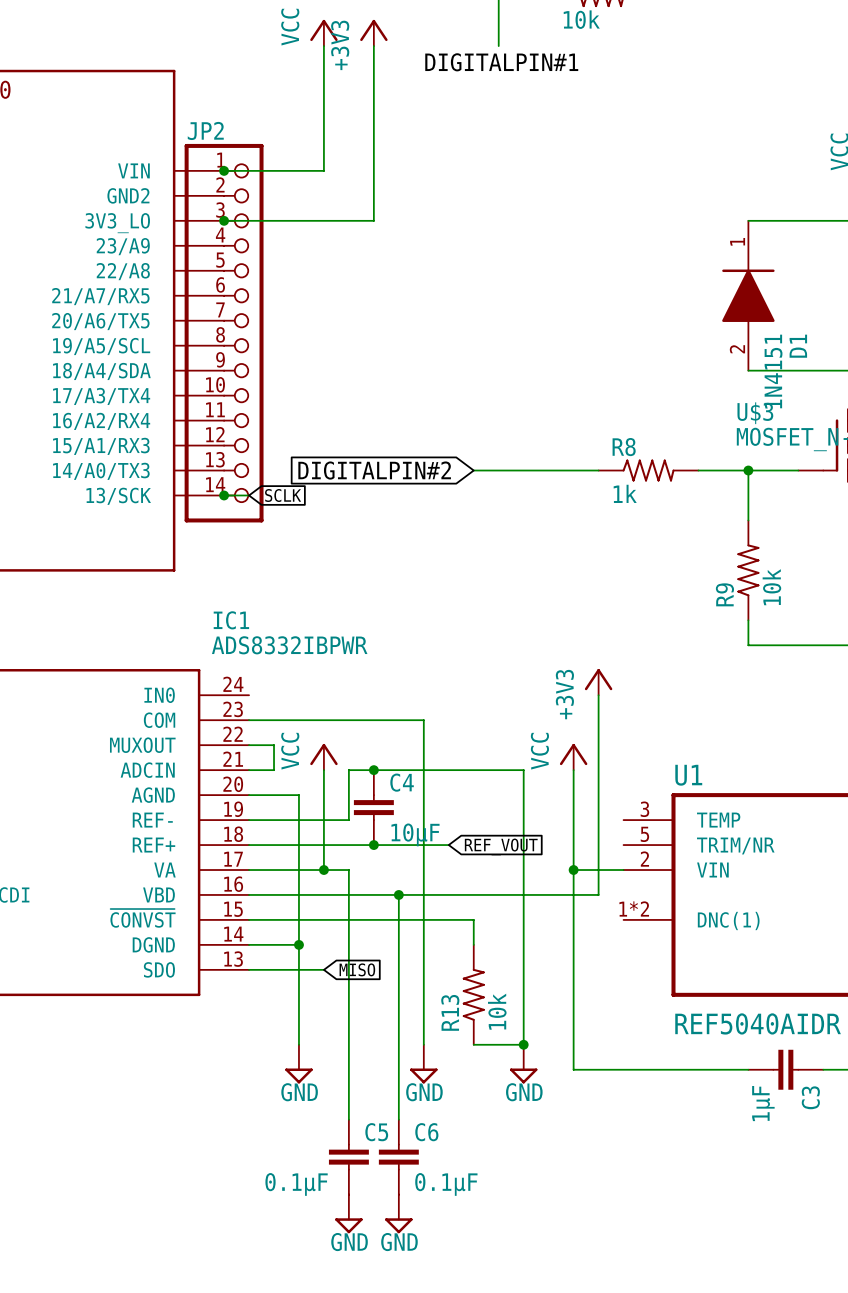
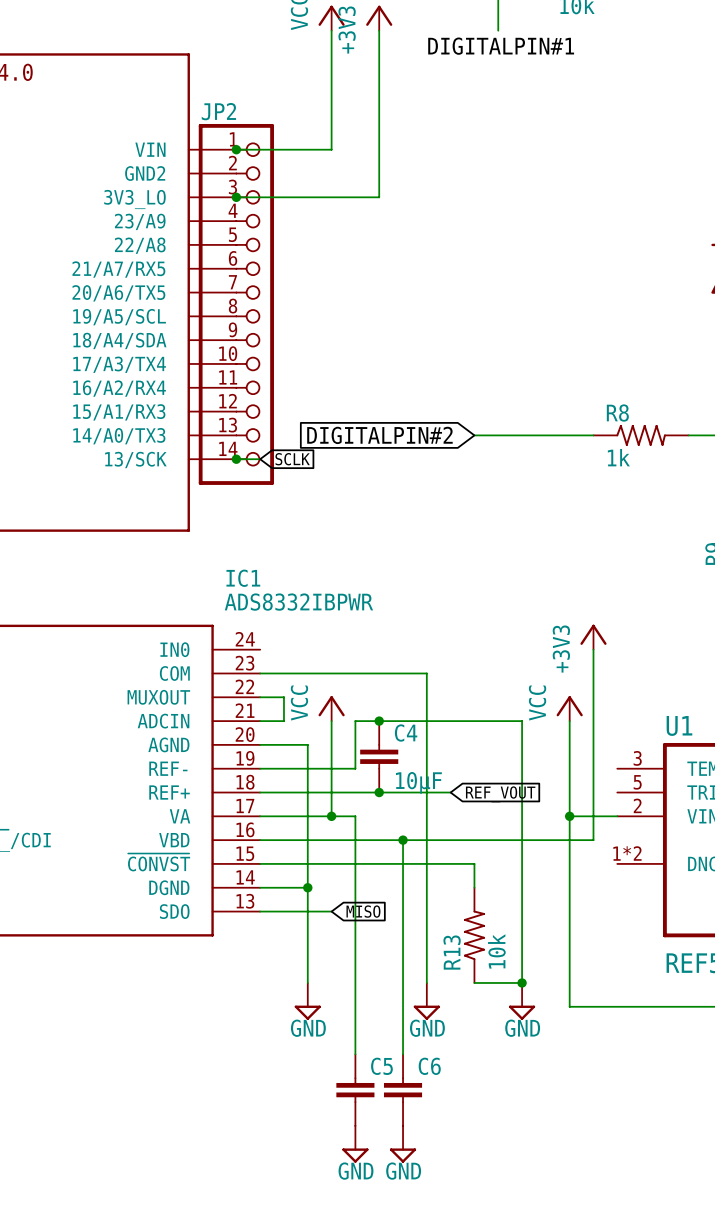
C5 value: 0.1μF (296, 1184) -> none
C6 value: 0.1μF (446, 1184) -> none

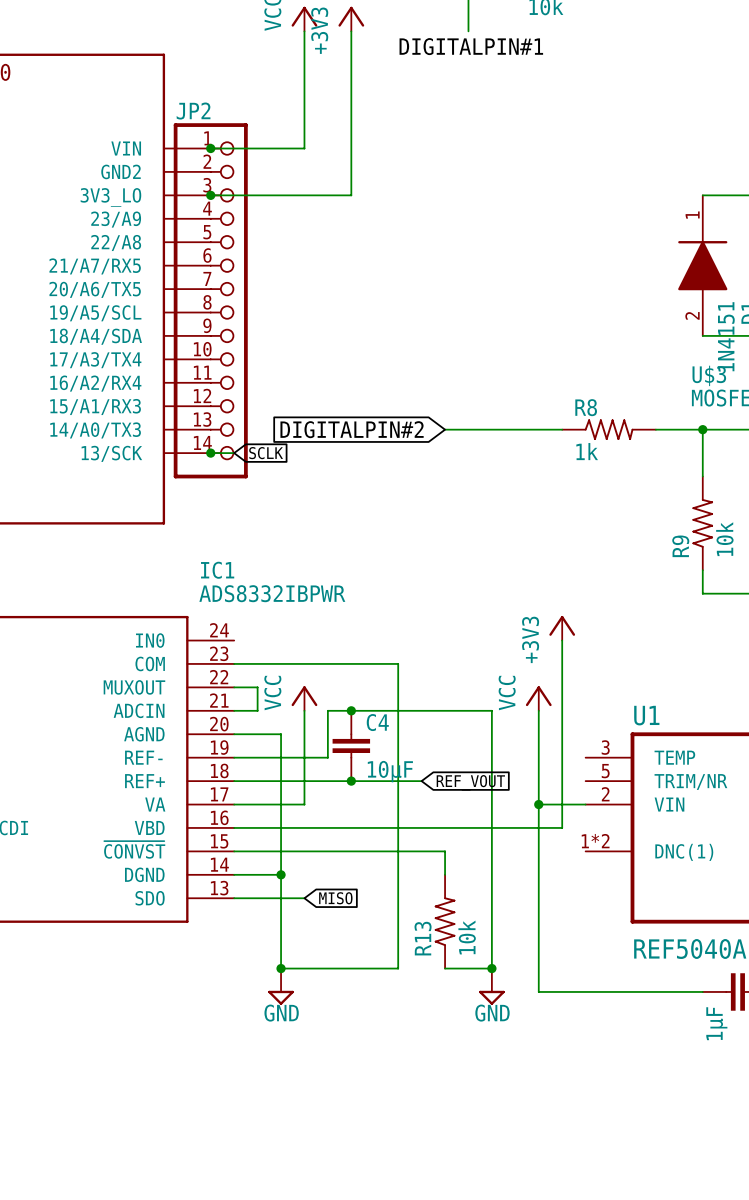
wire: (331, 816) (355, 816) (355, 1054) -> none
junction: (331, 816) -> none
wire: (403, 840) (403, 1054) -> none
junction: (403, 840) -> none
wire: none -> (281, 968) (398, 968)
junction: none -> (281, 968)
power symbol: GND (426, 1001) -> none
C5: (355, 1090) -> none
C6: (403, 1090) -> none
power symbol: GND (355, 1144) -> none
power symbol: GND (403, 1144) -> none

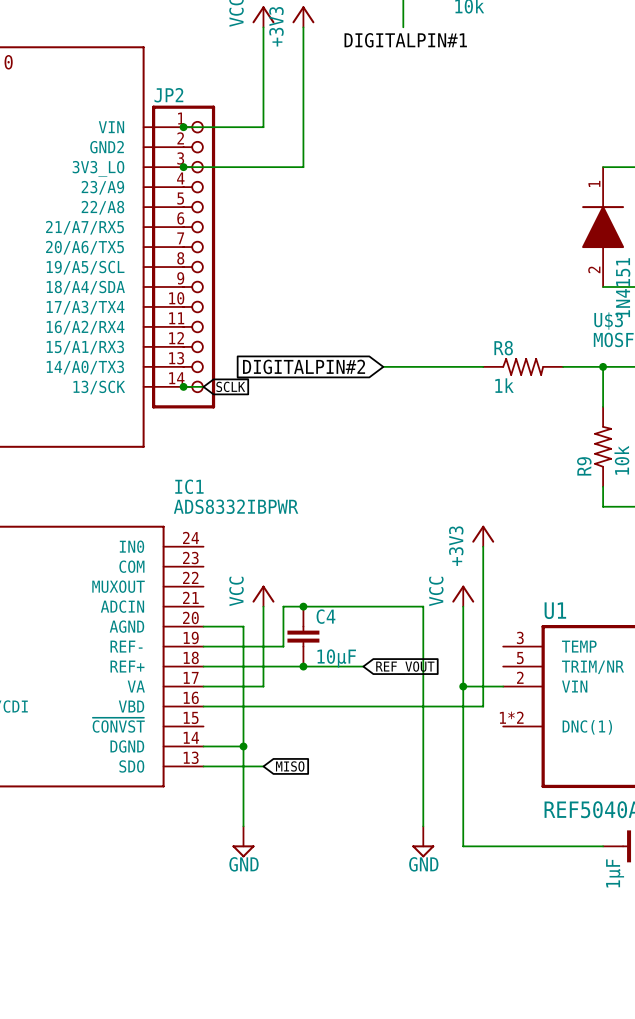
wire: (234, 663) (398, 663) (398, 968) (281, 968) -> none
wire: (234, 687) (257, 687) (257, 710) (234, 710) -> none
wire: (234, 851) (445, 851) (445, 874) -> none
R13: 10k (445, 921) -> none
junction: (281, 968) -> none
wire: (445, 968) (491, 968) -> none
junction: (491, 968) -> none

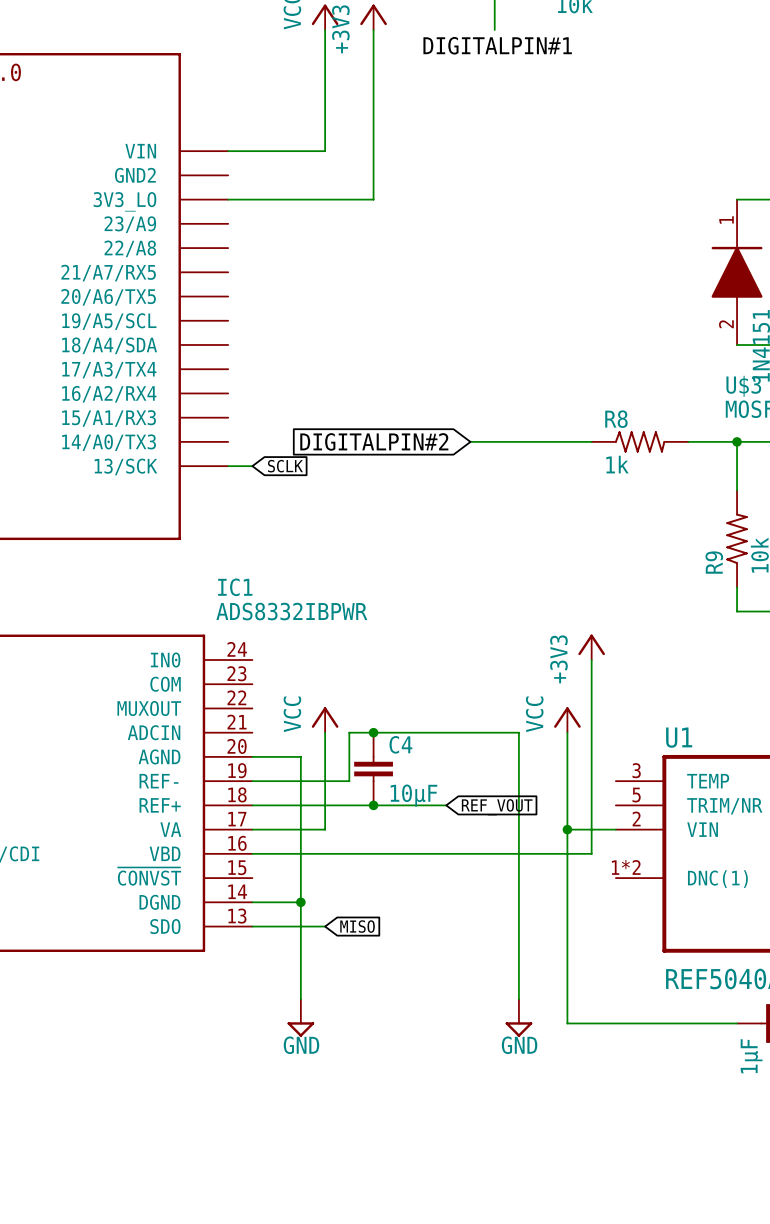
junction: (183, 127) -> none
junction: (183, 167) -> none
JP2: (183, 257) -> none
junction: (183, 386) -> none

